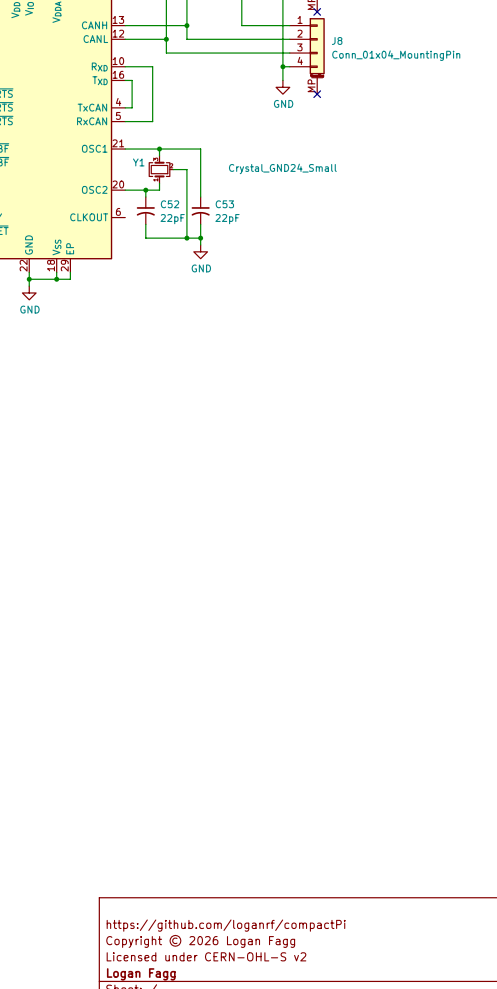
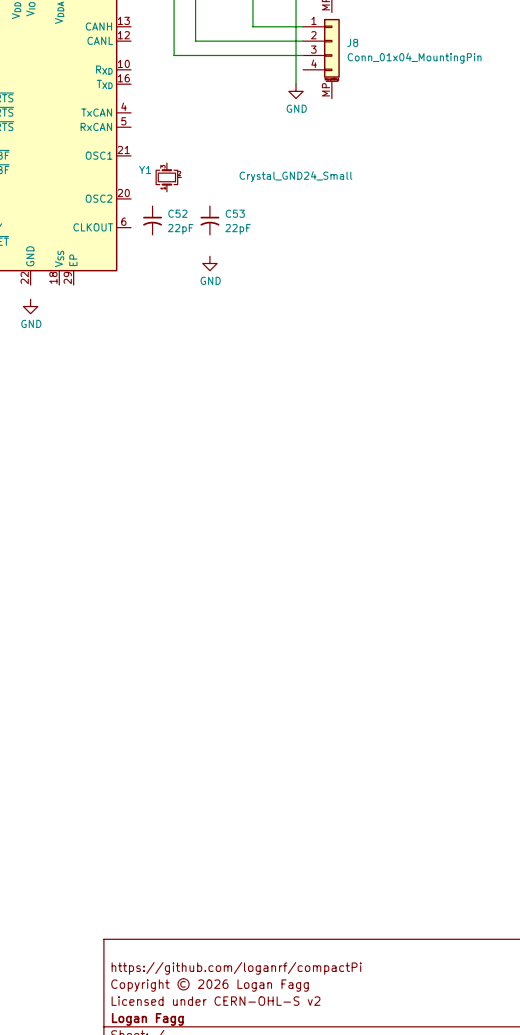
no-connect mark: (317, 11) -> none
wire: (125, 25) (186, 25) -> none
junction: (186, 25) -> none
wire: (125, 39) (166, 39) -> none
junction: (166, 39) -> none
wire: (125, 66) (152, 66) (152, 121) (125, 121) -> none
wire: (282, 66) (289, 66) -> none
junction: (282, 66) -> none
wire: (125, 80) (132, 80) (132, 107) (125, 107) -> none
no-connect mark: (317, 94) -> none
wire: (125, 149) (200, 149) (200, 197) -> none
wire: (159, 149) (159, 155) -> none
junction: (159, 149) -> none
wire: (173, 169) (186, 169) (186, 238) -> none
wire: (159, 183) (159, 190) (125, 190) -> none
wire: (145, 190) (145, 197) -> none
junction: (145, 190) -> none
wire: (145, 224) (145, 238) (200, 238) -> none
wire: (200, 224) (200, 244) -> none
junction: (186, 238) -> none
junction: (200, 238) -> none
wire: (29, 272) (29, 286) -> none
wire: (56, 272) (56, 279) -> none
wire: (70, 272) (70, 279) (29, 279) -> none
junction: (29, 279) -> none
junction: (56, 279) -> none

